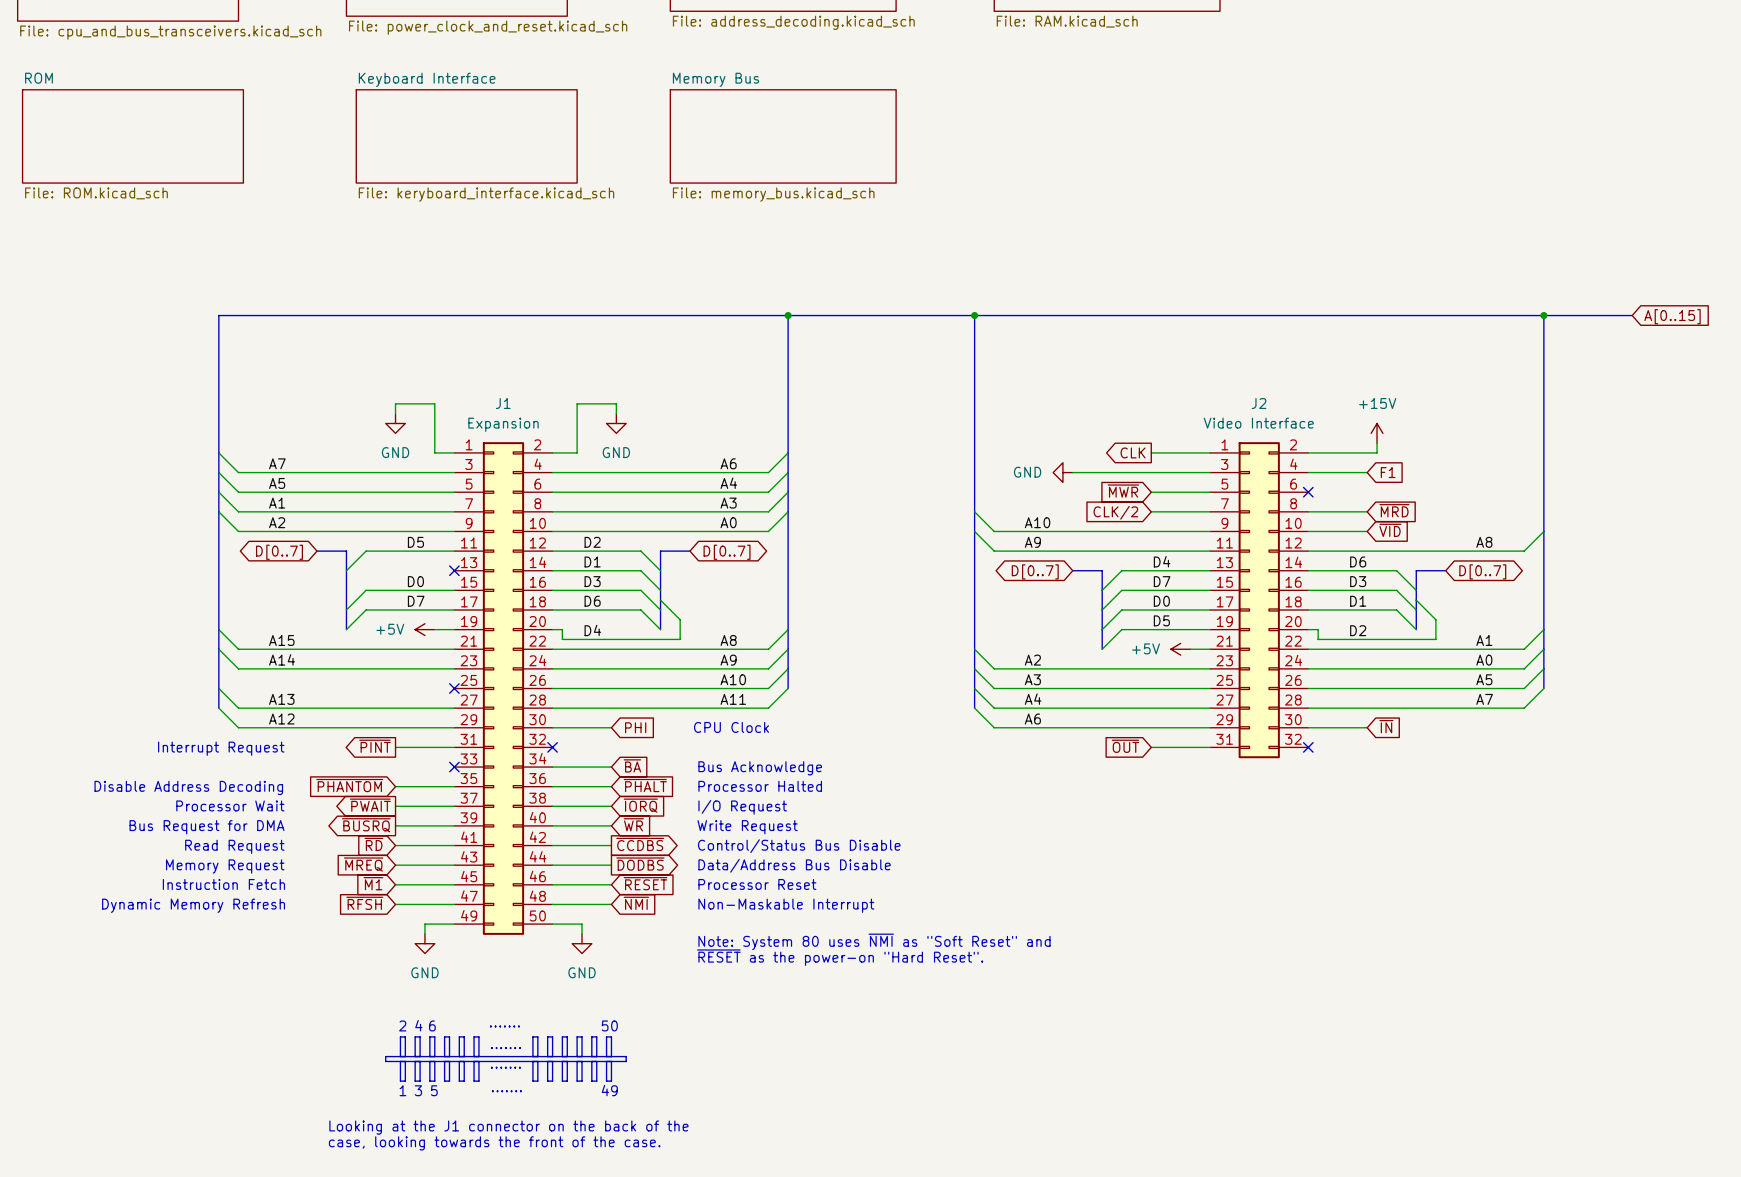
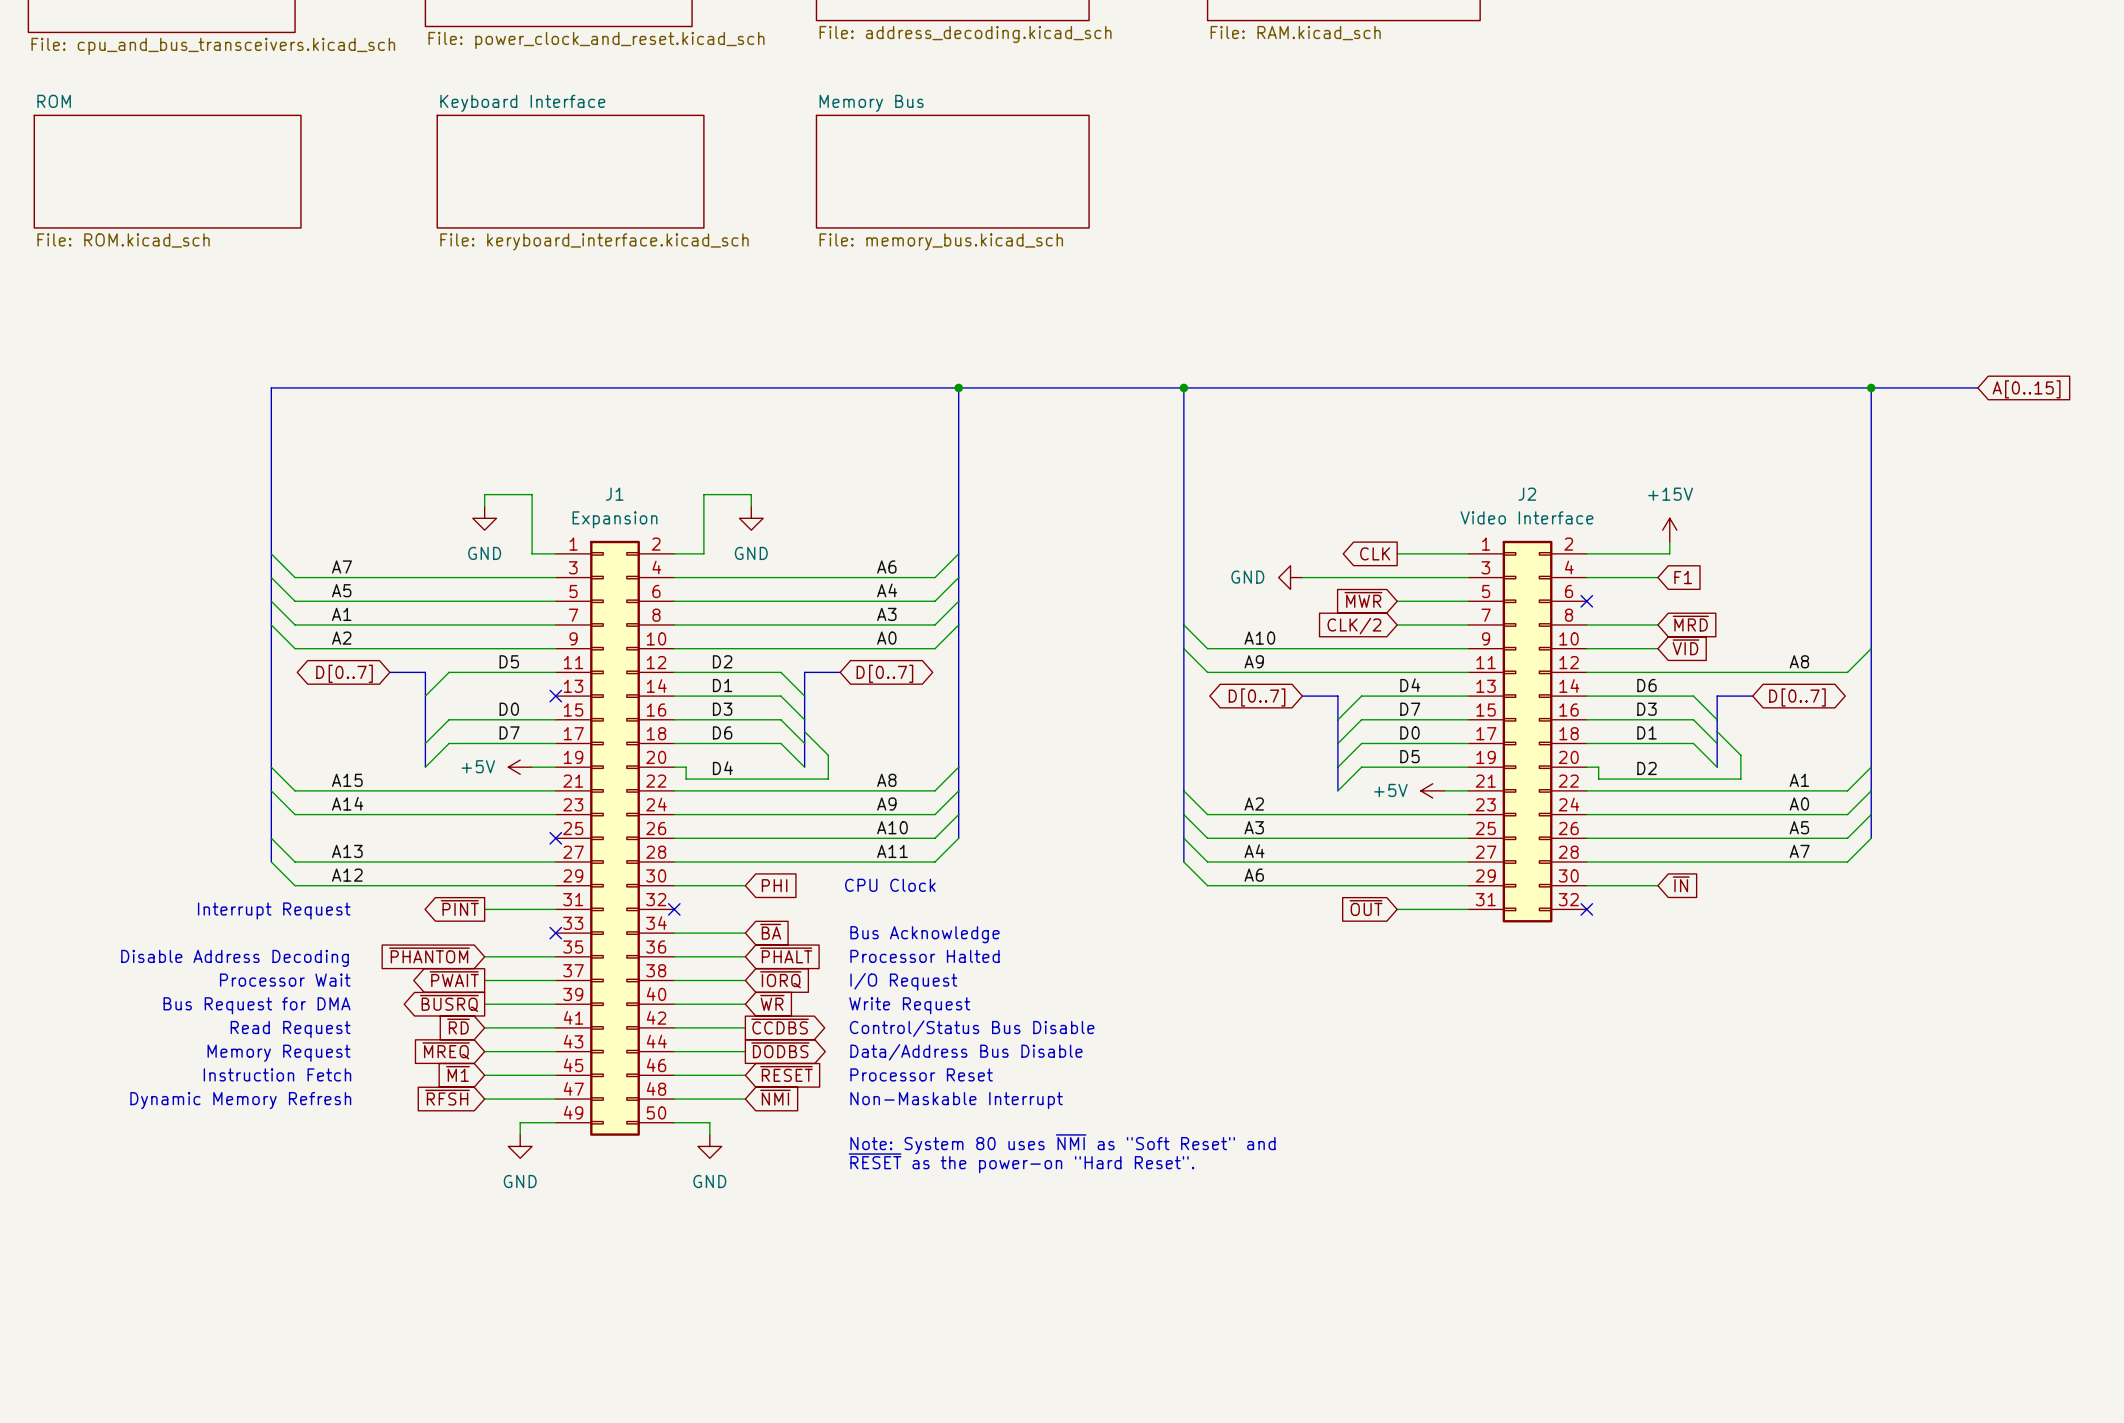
text: 2 (402, 1025) -> none
text: 4 (418, 1025) -> none
text: 6 (432, 1025) -> none
text: 50 (609, 1025) -> none
text: ....... (504, 1026) -> none
text: ....... (505, 1048) -> none
line: (385, 1056) (626, 1056) (626, 1061) (385, 1061) (385, 1056) -> none
line: (400, 1056) (400, 1036) (405, 1036) (405, 1056) -> none
line: (415, 1056) (415, 1036) (420, 1036) (420, 1056) -> none
line: (429, 1056) (429, 1036) (434, 1036) (434, 1056) -> none
line: (444, 1056) (444, 1036) (449, 1036) (449, 1056) -> none
line: (459, 1056) (459, 1036) (464, 1036) (464, 1056) -> none
line: (474, 1056) (474, 1036) (478, 1036) (478, 1056) -> none
line: (532, 1056) (532, 1036) (537, 1036) (537, 1056) -> none
line: (547, 1056) (547, 1036) (552, 1036) (552, 1056) -> none
line: (562, 1056) (562, 1036) (567, 1036) (567, 1056) -> none
line: (577, 1056) (577, 1036) (582, 1036) (582, 1056) -> none
line: (591, 1056) (591, 1036) (596, 1036) (596, 1056) -> none
line: (606, 1056) (606, 1036) (611, 1036) (611, 1056) -> none
line: (400, 1061) (400, 1081) (405, 1081) (405, 1061) -> none
line: (415, 1061) (415, 1081) (420, 1081) (420, 1061) -> none
line: (429, 1061) (429, 1081) (434, 1081) (434, 1061) -> none
line: (444, 1061) (444, 1081) (449, 1081) (449, 1061) -> none
line: (459, 1061) (459, 1081) (464, 1081) (464, 1061) -> none
line: (474, 1061) (474, 1081) (478, 1081) (478, 1061) -> none
line: (532, 1061) (532, 1081) (537, 1081) (537, 1061) -> none
line: (547, 1061) (547, 1081) (552, 1081) (552, 1061) -> none
line: (562, 1061) (562, 1081) (567, 1081) (567, 1061) -> none
line: (577, 1061) (577, 1081) (582, 1081) (582, 1061) -> none
line: (591, 1061) (591, 1081) (596, 1081) (596, 1061) -> none
line: (606, 1061) (606, 1081) (611, 1081) (611, 1061) -> none
text: ....... (505, 1067) -> none
text: 1 (402, 1090) -> none
text: 3 (418, 1090) -> none
text: 5 (434, 1090) -> none
text: 49 (609, 1090) -> none
text: ....... (506, 1091) -> none
text: Looking at the J1 connector on the back of the (508, 1127) -> none
text: case, looking towards the front of the case. (494, 1143) -> none

